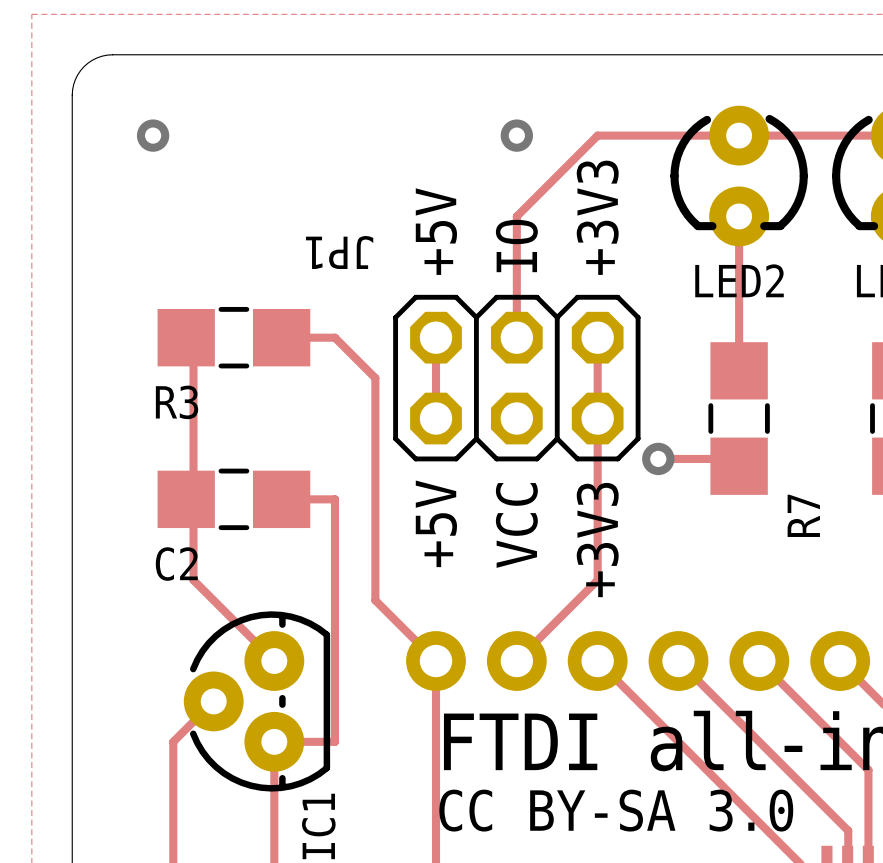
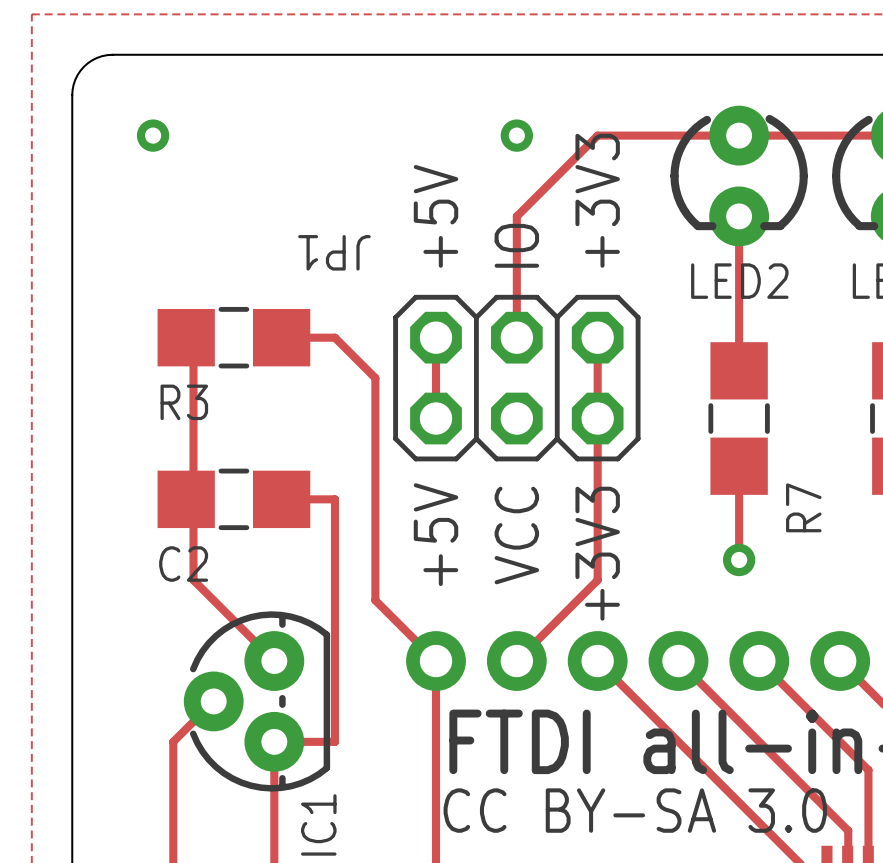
track: (658, 458) (739, 458) -> none
via: (658, 458) -> none
track: none -> (739, 466) (739, 559)
via: none -> (739, 559)

